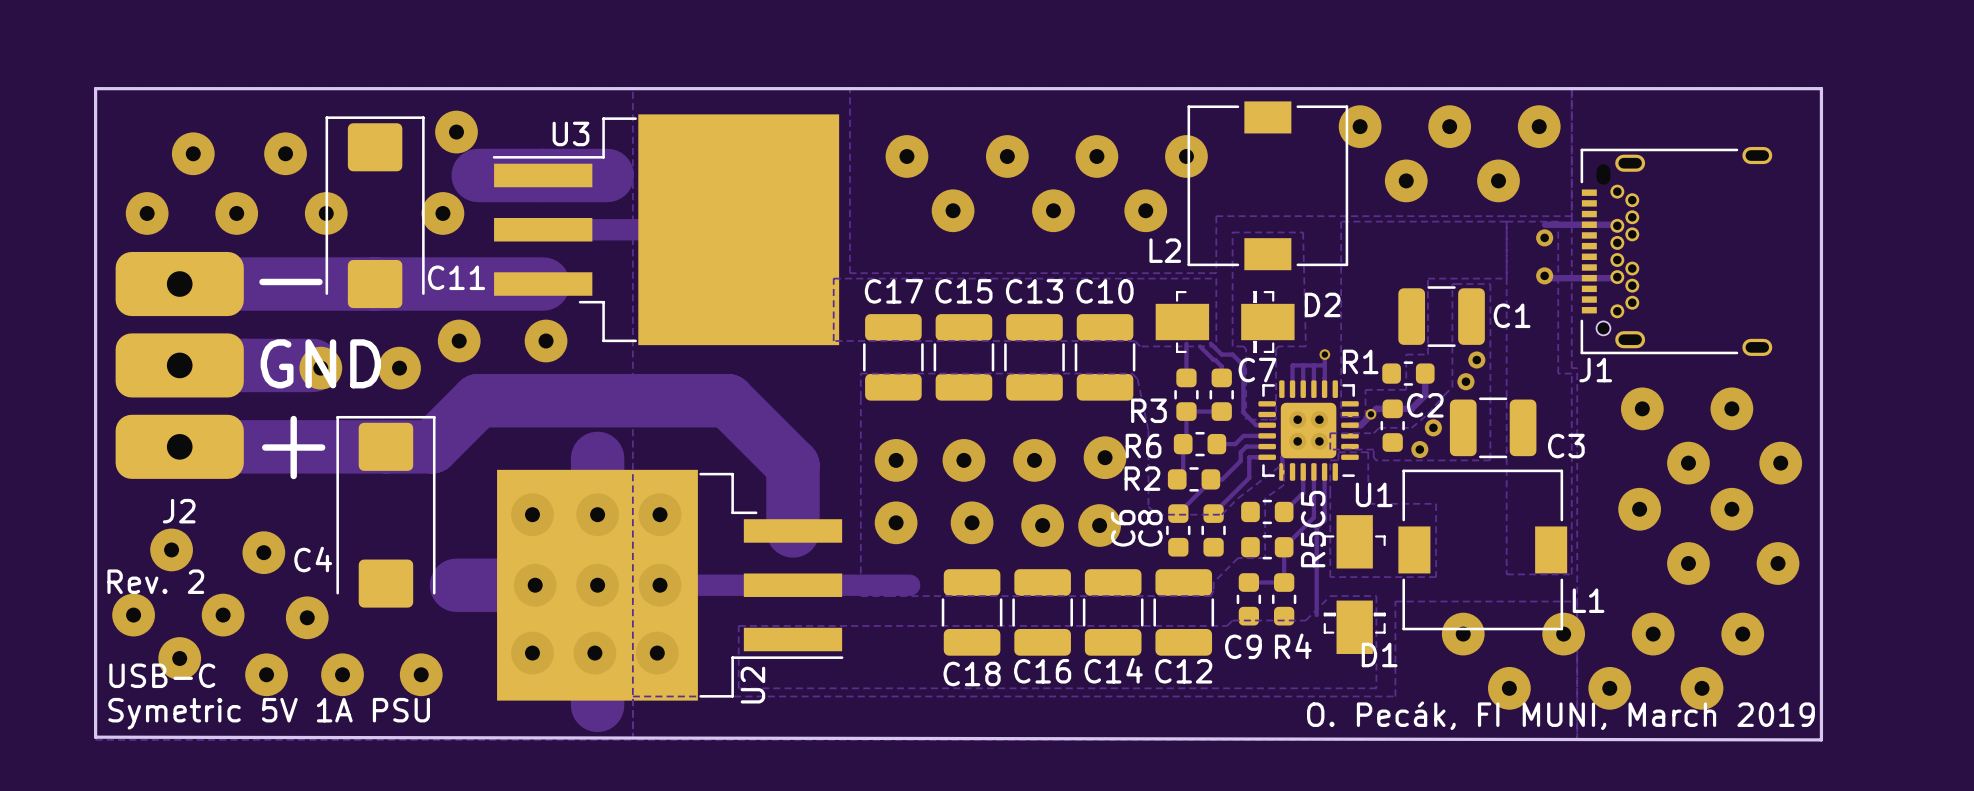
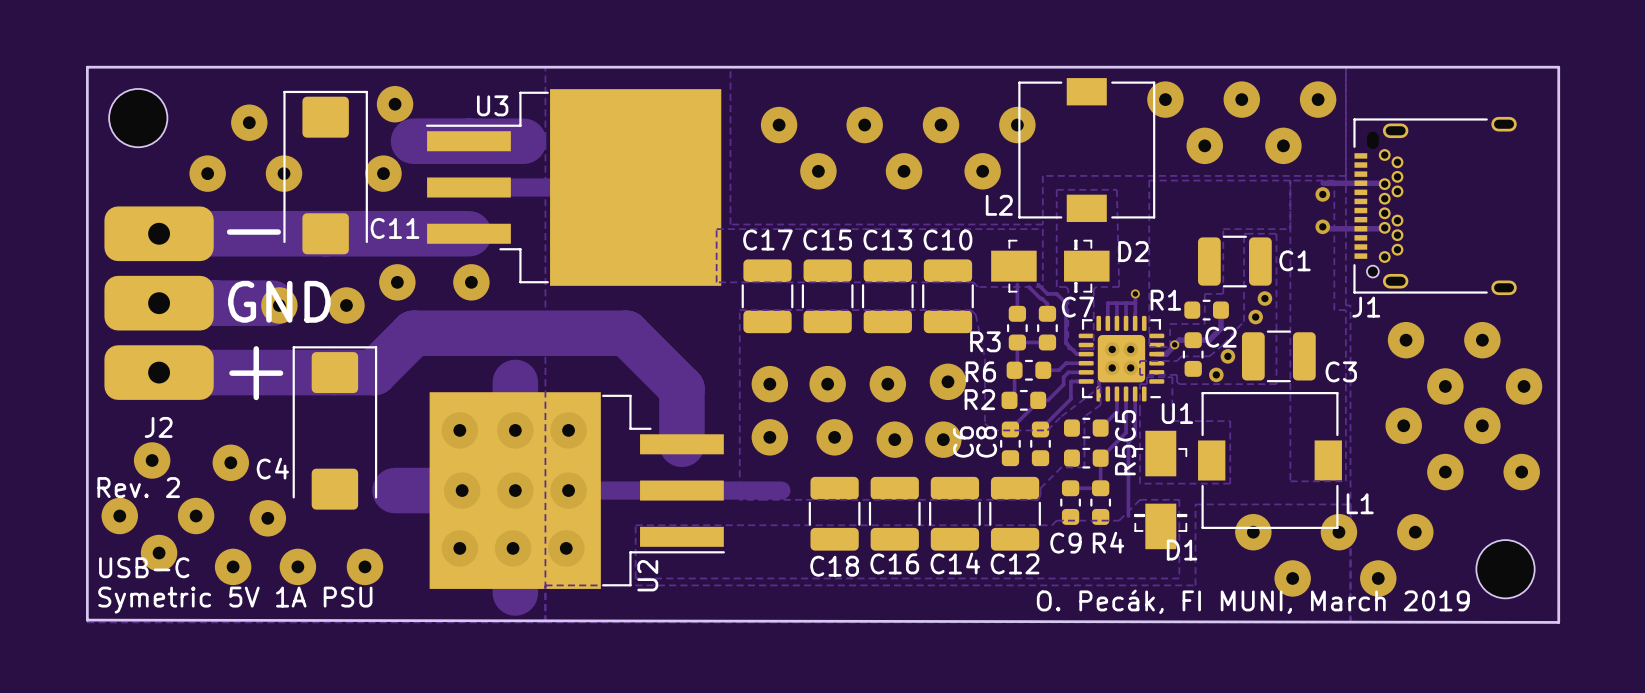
part: none -> (138, 118)
via: (193, 153) -> none
via: (147, 213) -> none
via: (1742, 634) -> none
part: none -> (1505, 569)
via: (1702, 688) -> none
text position: O. Pecák, FI MUNI, March 2019 (1560, 715) -> O. Pecák, FI MUNI, March 2019 (1253, 601)

